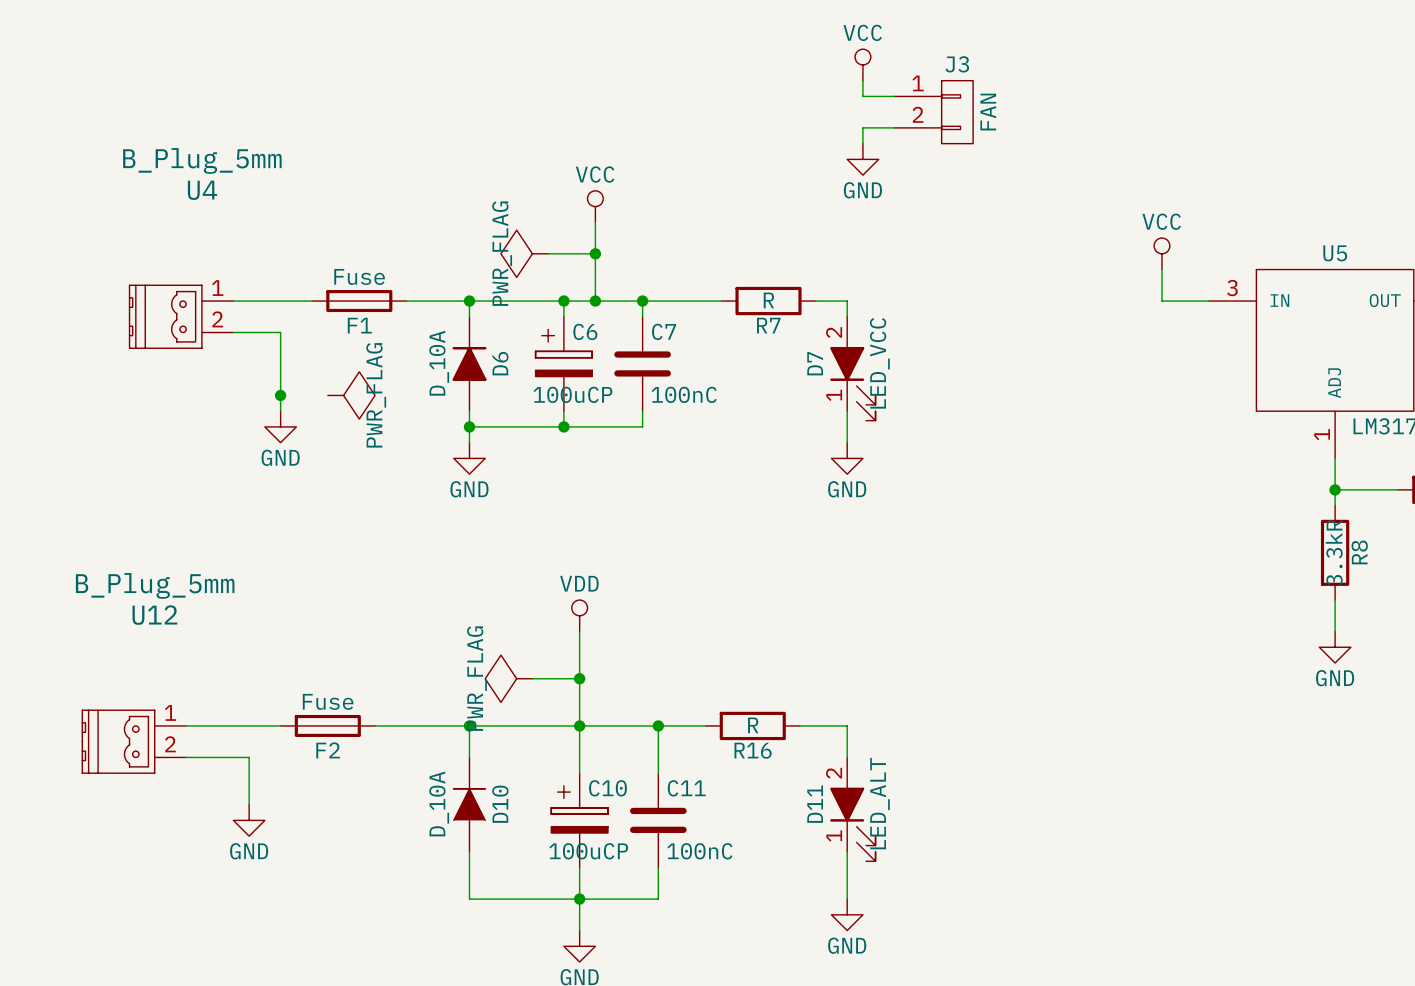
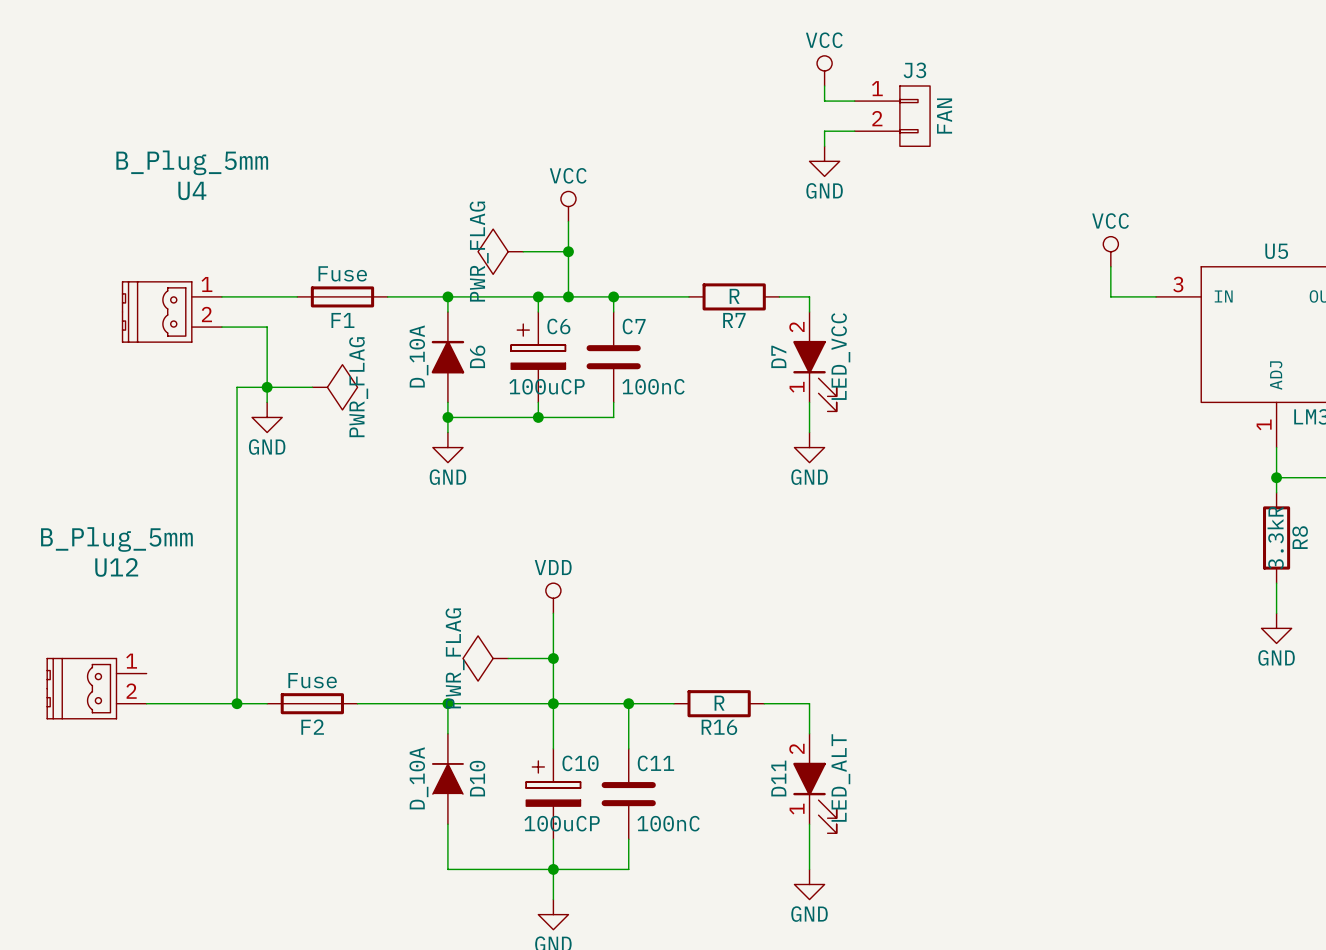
wire: none -> (312, 387) (237, 387) (237, 703)
junction: none -> (237, 703)
U12 position: (134, 741) -> (96, 688)
wire: (186, 757) (249, 757) (249, 804) -> none
power symbol: GND (249, 820) -> none

